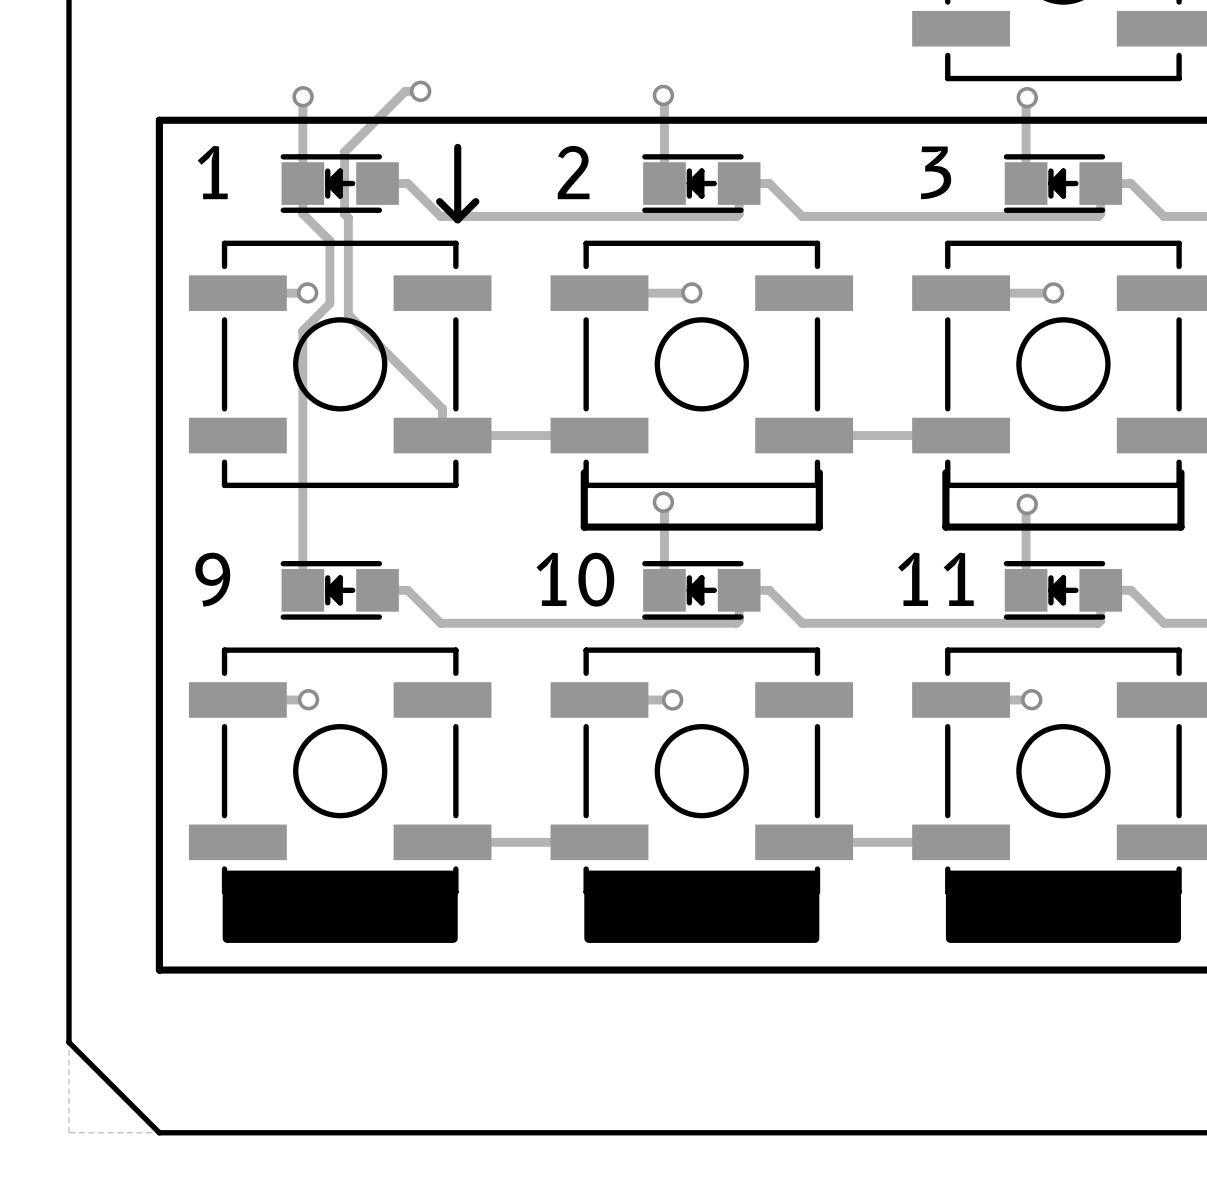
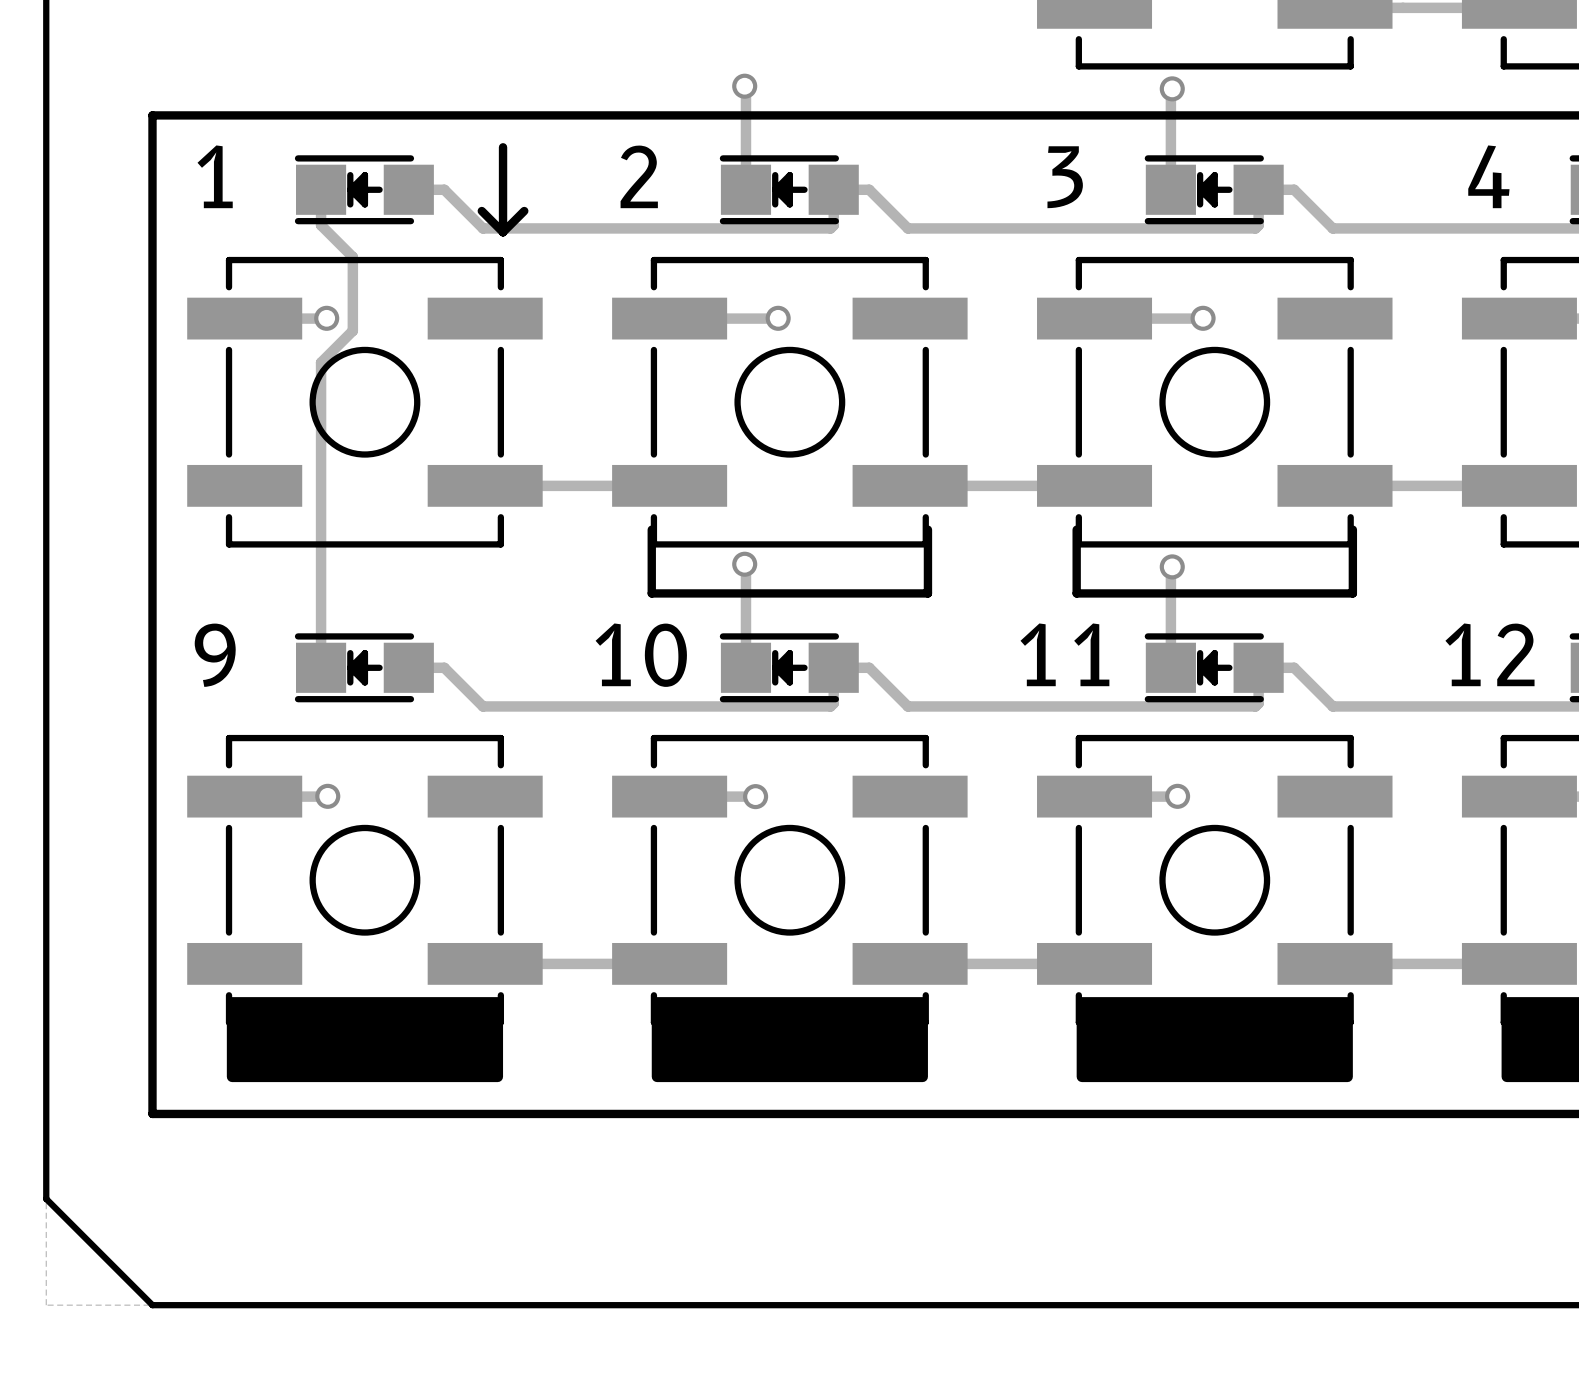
track: (420, 91) (405, 91) (344, 151) (344, 214) (348, 217) (348, 314) (442, 408) (442, 435) -> none
via: (420, 91) -> none
via: (303, 96) -> none
track: (302, 97) (302, 183) -> none

